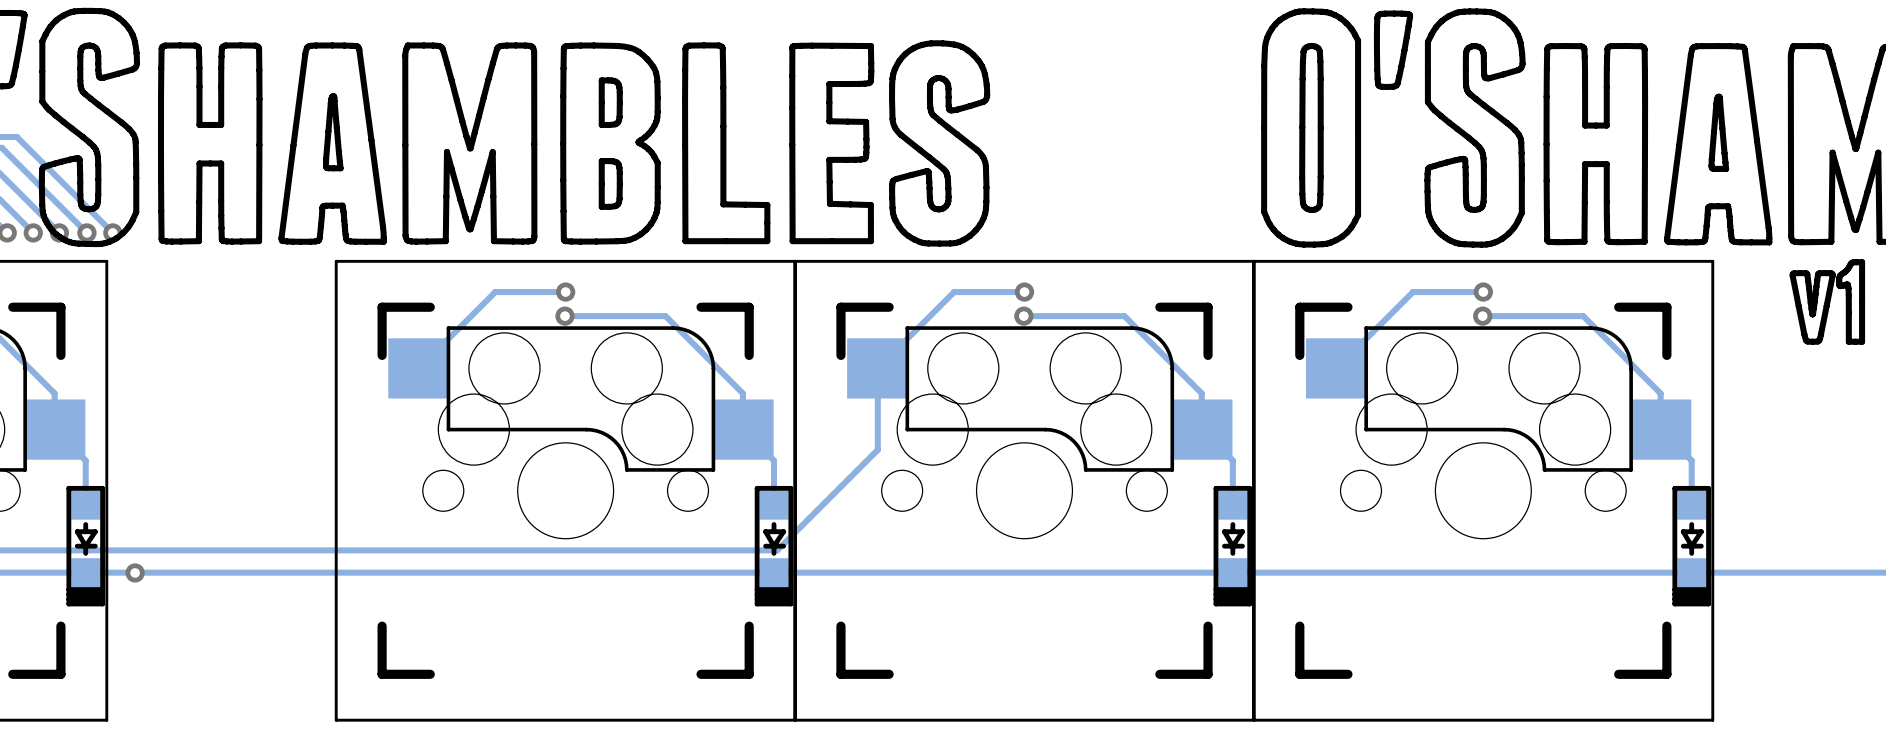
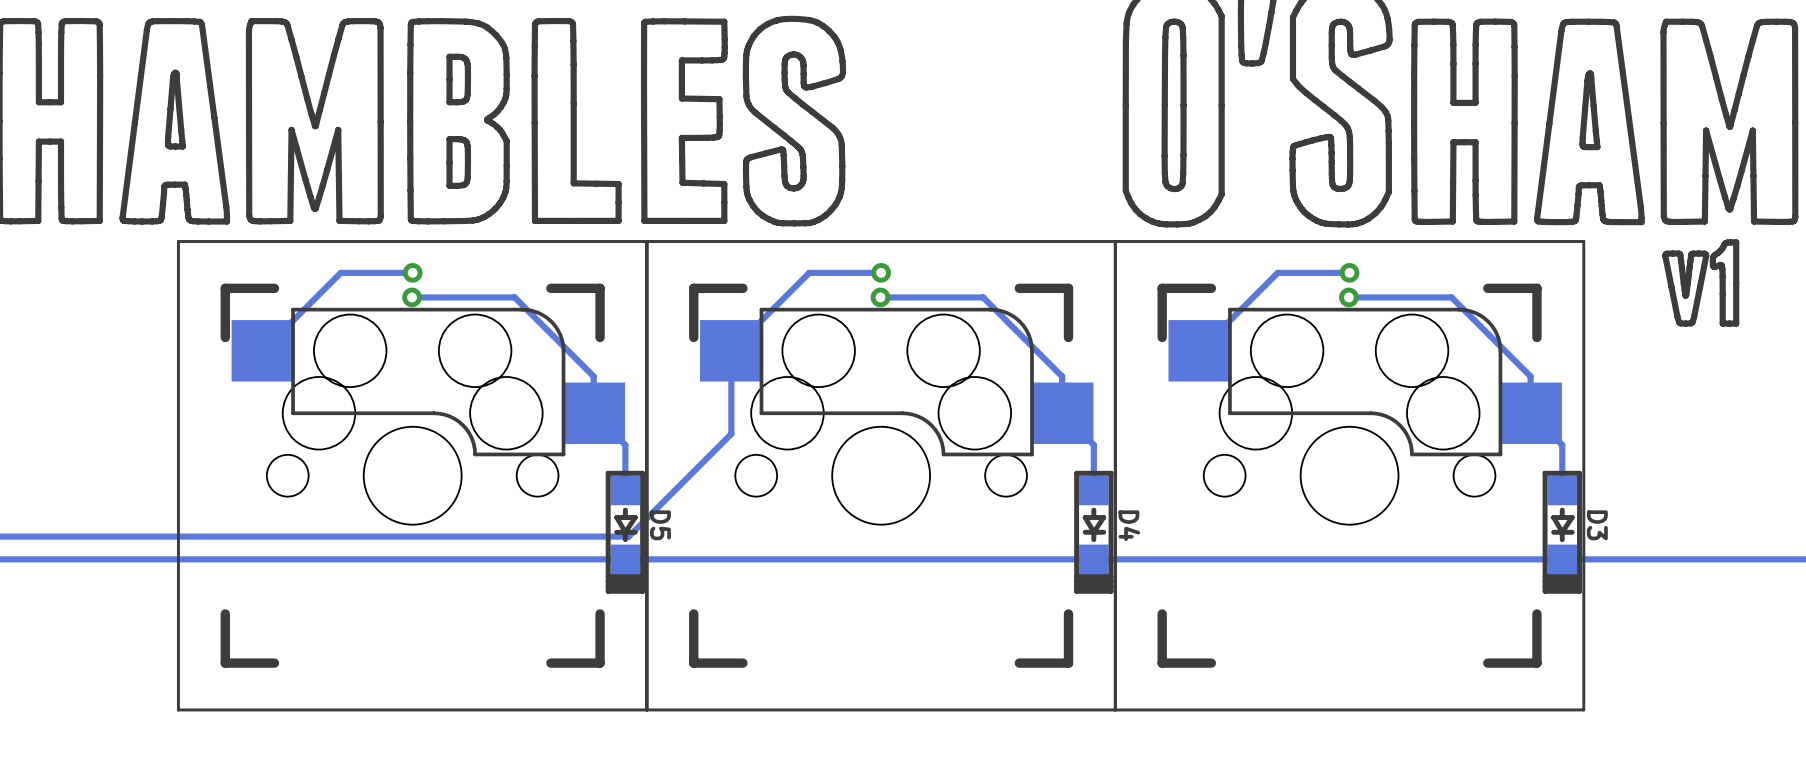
D5 name: none -> D5 (660, 525)
D4 name: none -> D4 (1129, 525)
D3 name: none -> D3 (1597, 525)

